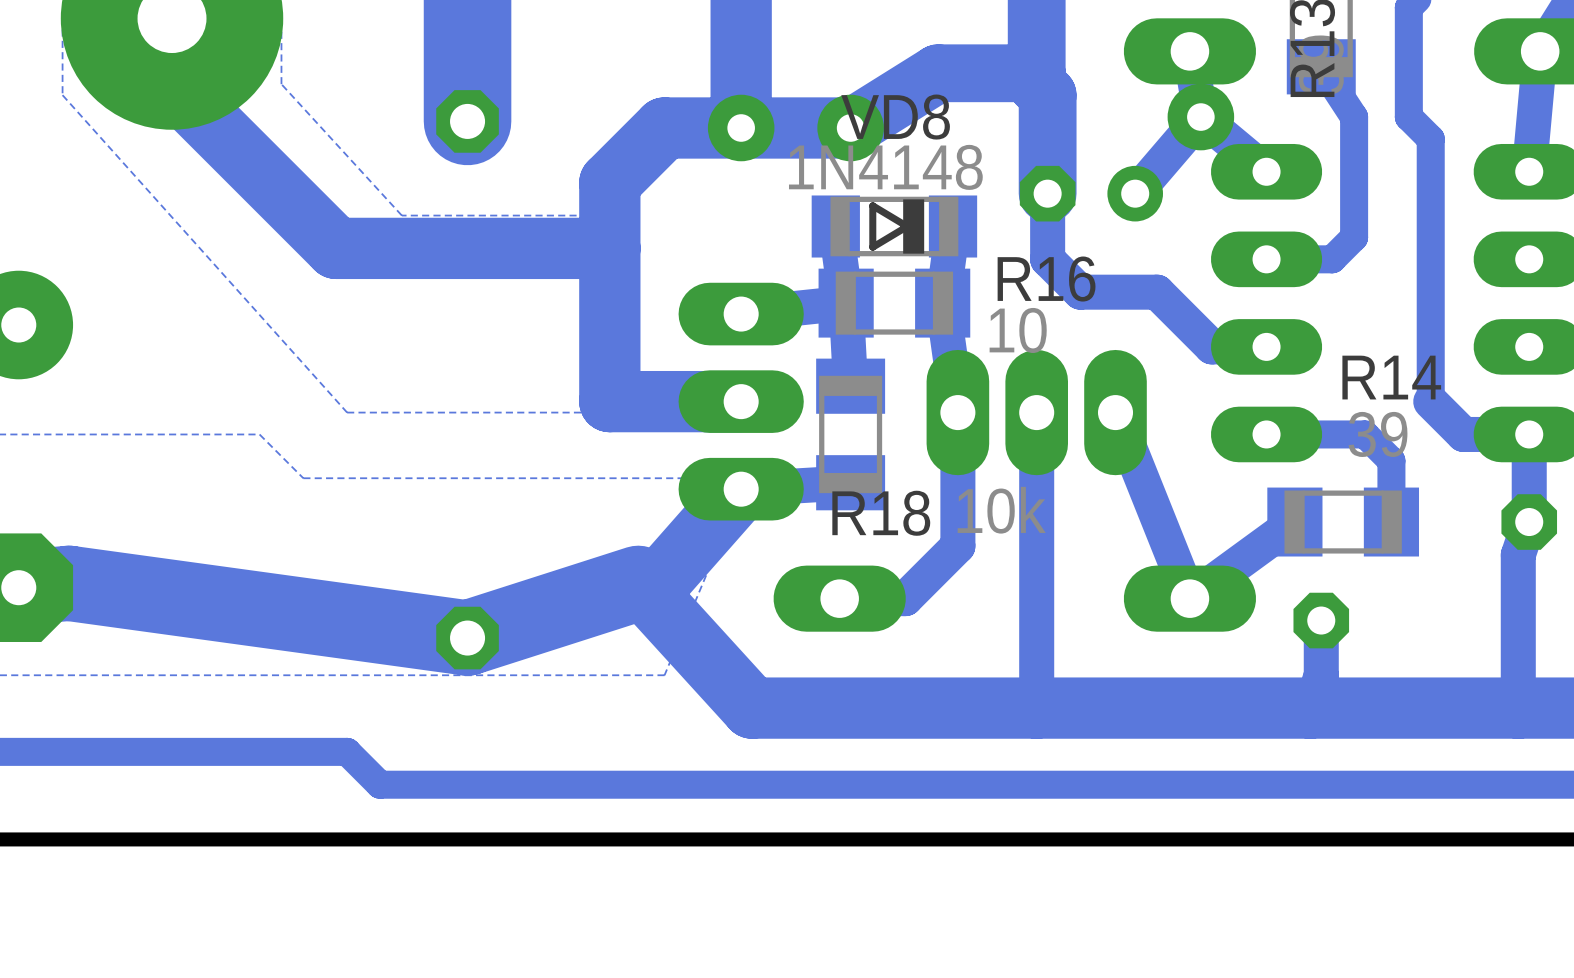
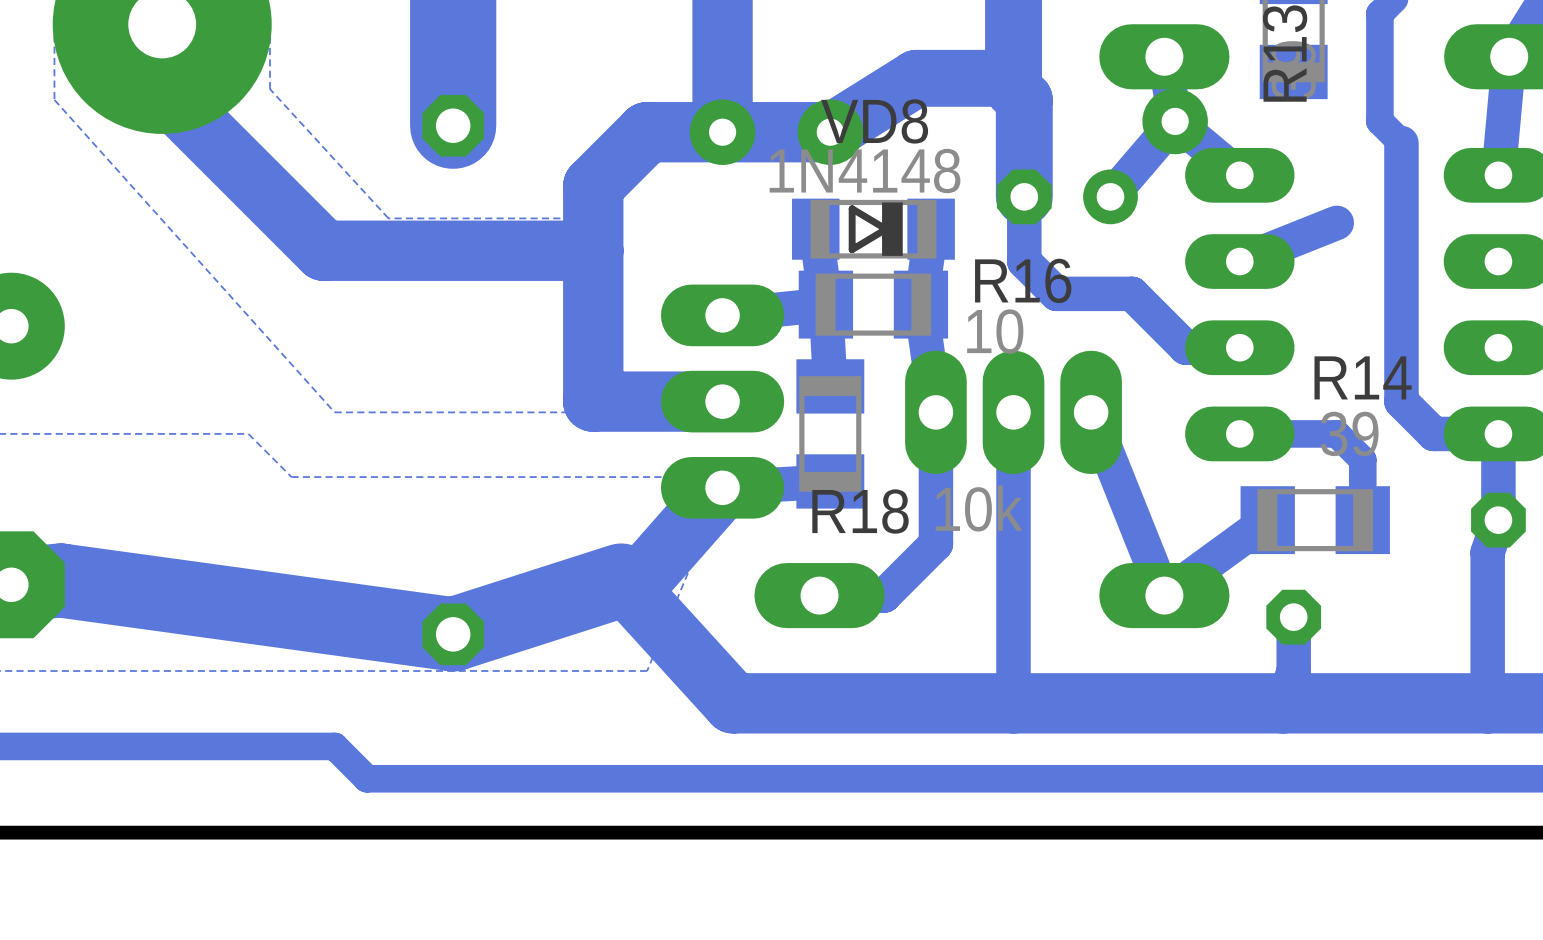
track: (1321, 66) (1354, 117) (1354, 237) (1332, 259) (1266, 259) -> (1336, 222) (1239, 261)
track width: thin (1430, 138) (1430, 401) -> thick (1401, 142) (1401, 401)

